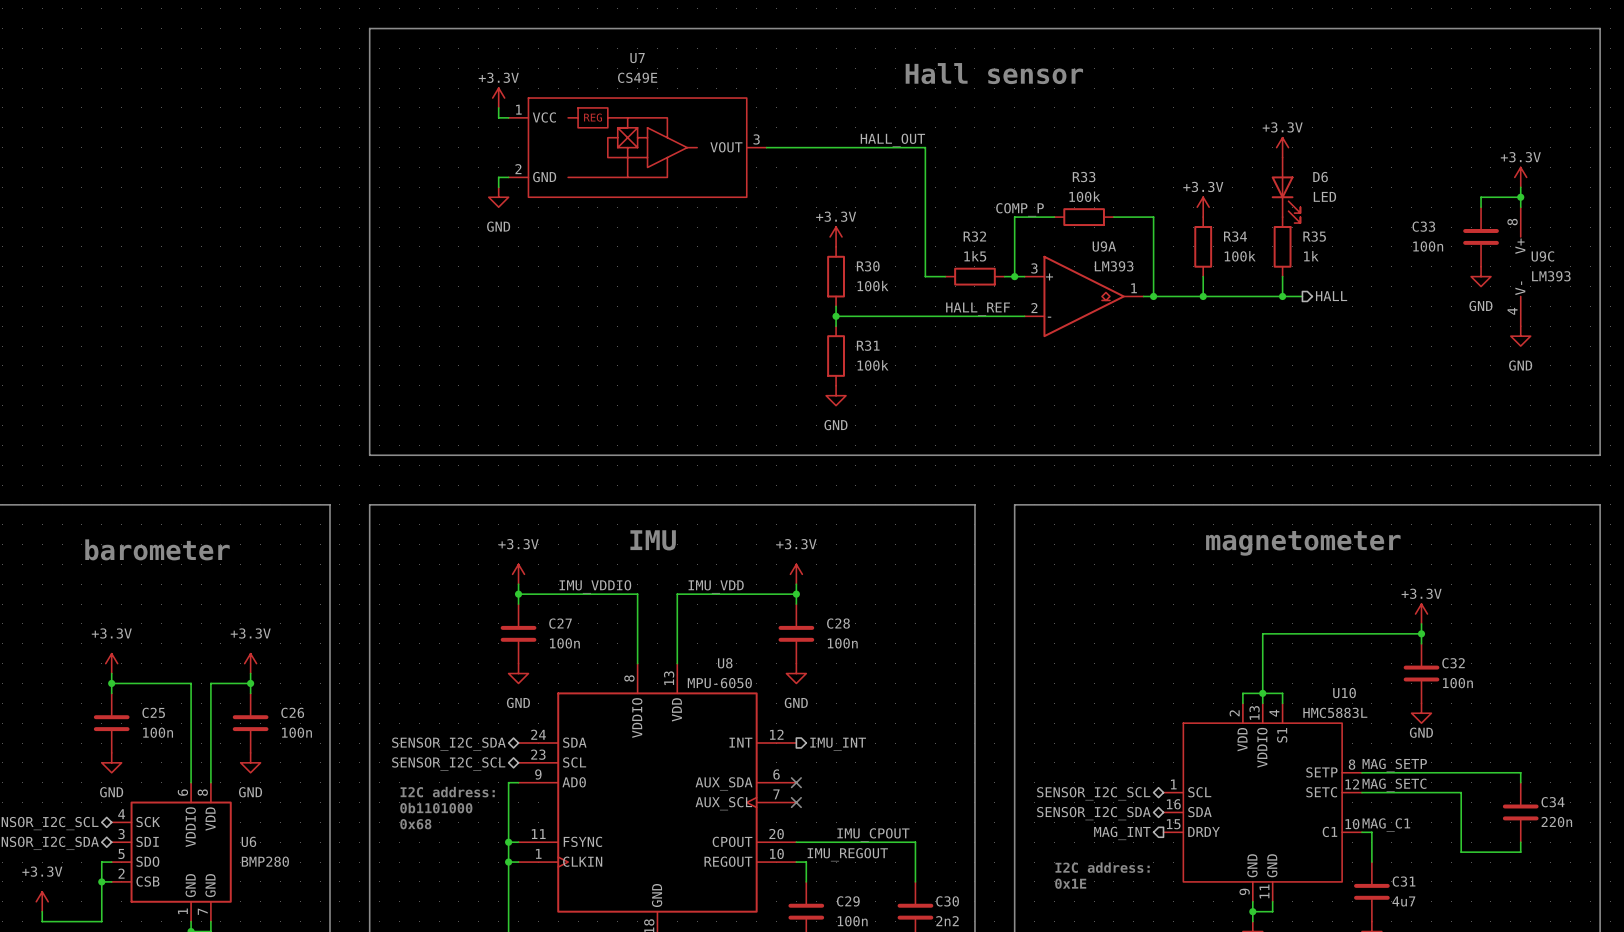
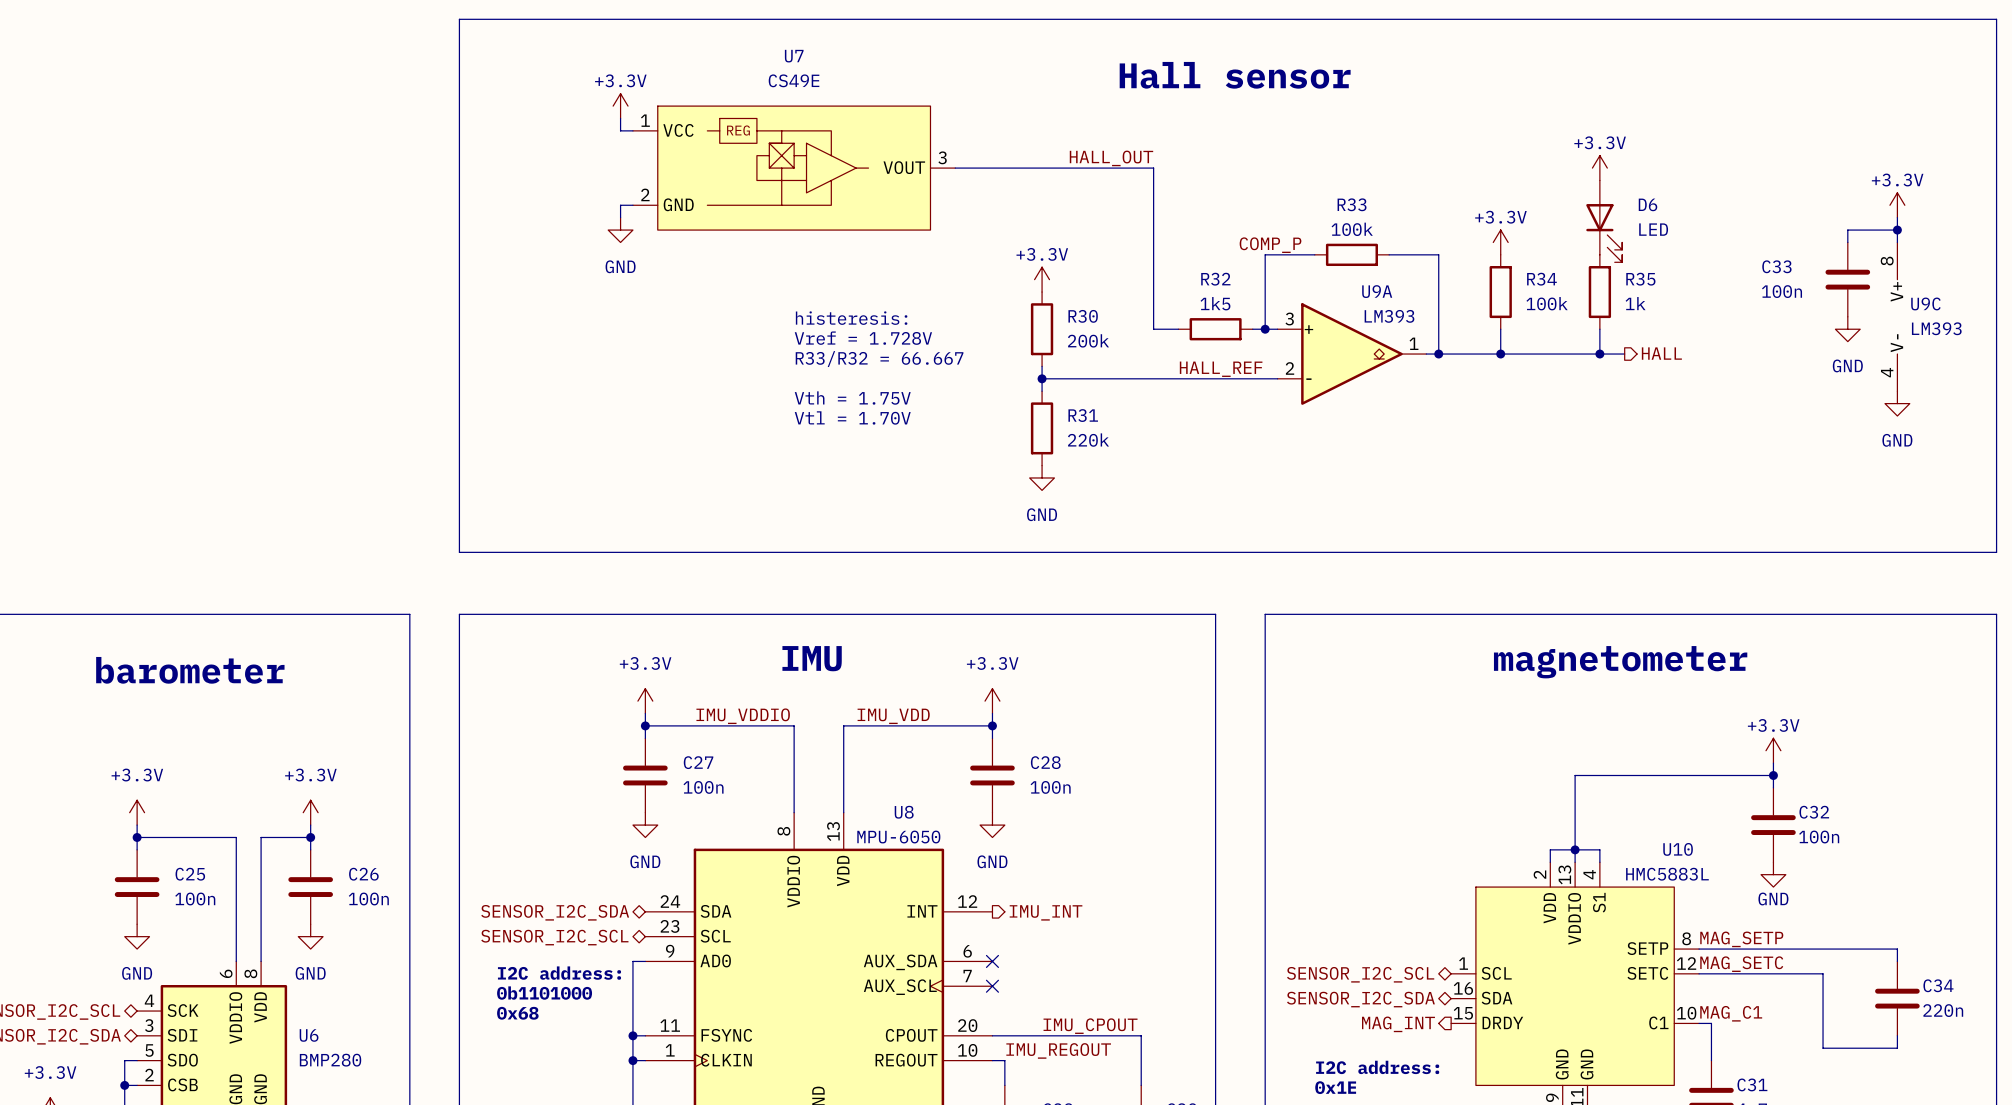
text: none -> histeresis: (851, 318)
text: none -> Vref = 1.728V (863, 338)
R30 value: 100k (873, 286) -> 200k (1088, 340)
text: none -> R33/R32 = 66.667 (879, 359)
text: none -> Vth = 1.75V (852, 398)
text: none -> Vtl = 1.70V (852, 417)
R31 value: 100k (873, 365) -> 220k (1088, 440)

